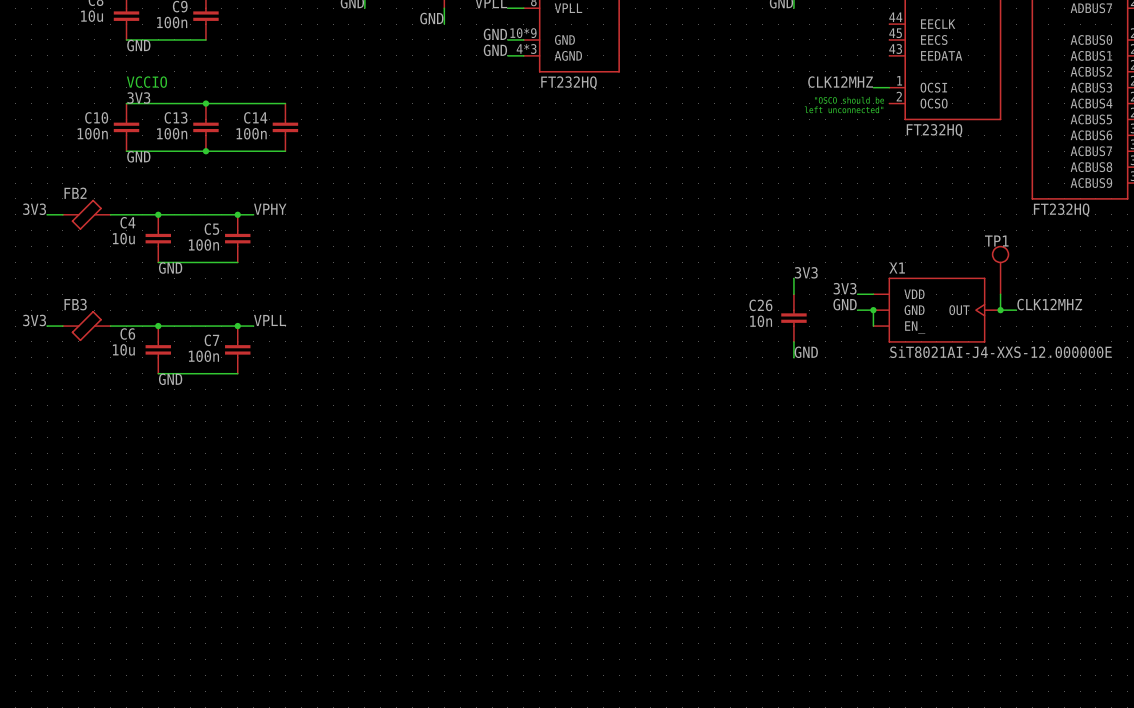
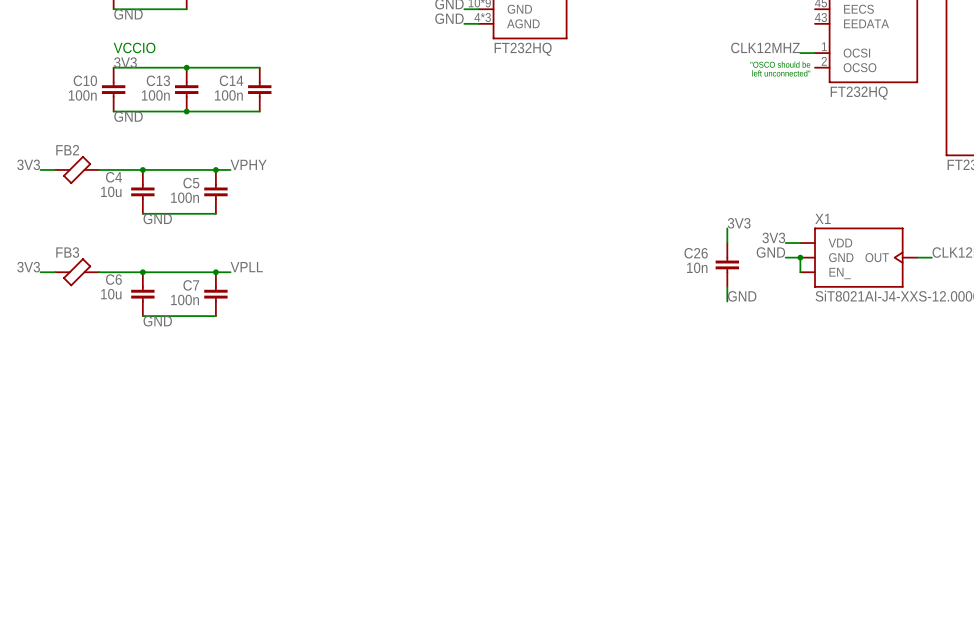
TP1: (1000, 270) -> none
wire: (1000, 294) (1000, 310) -> none
junction: (1000, 310) -> none

